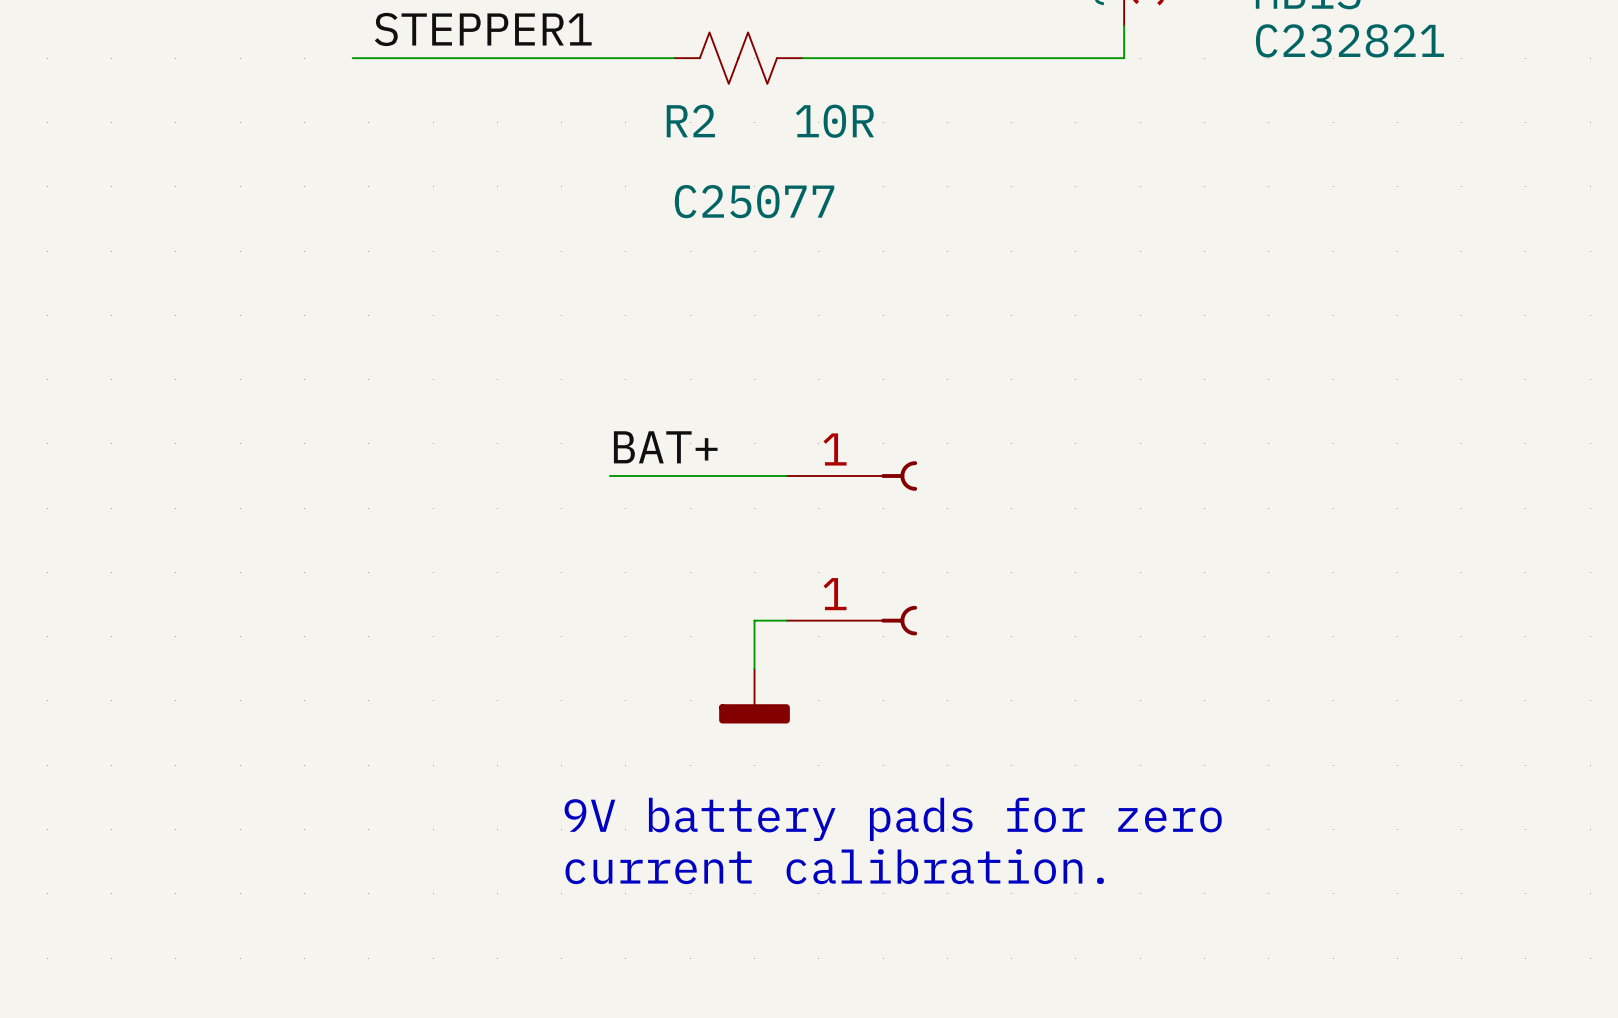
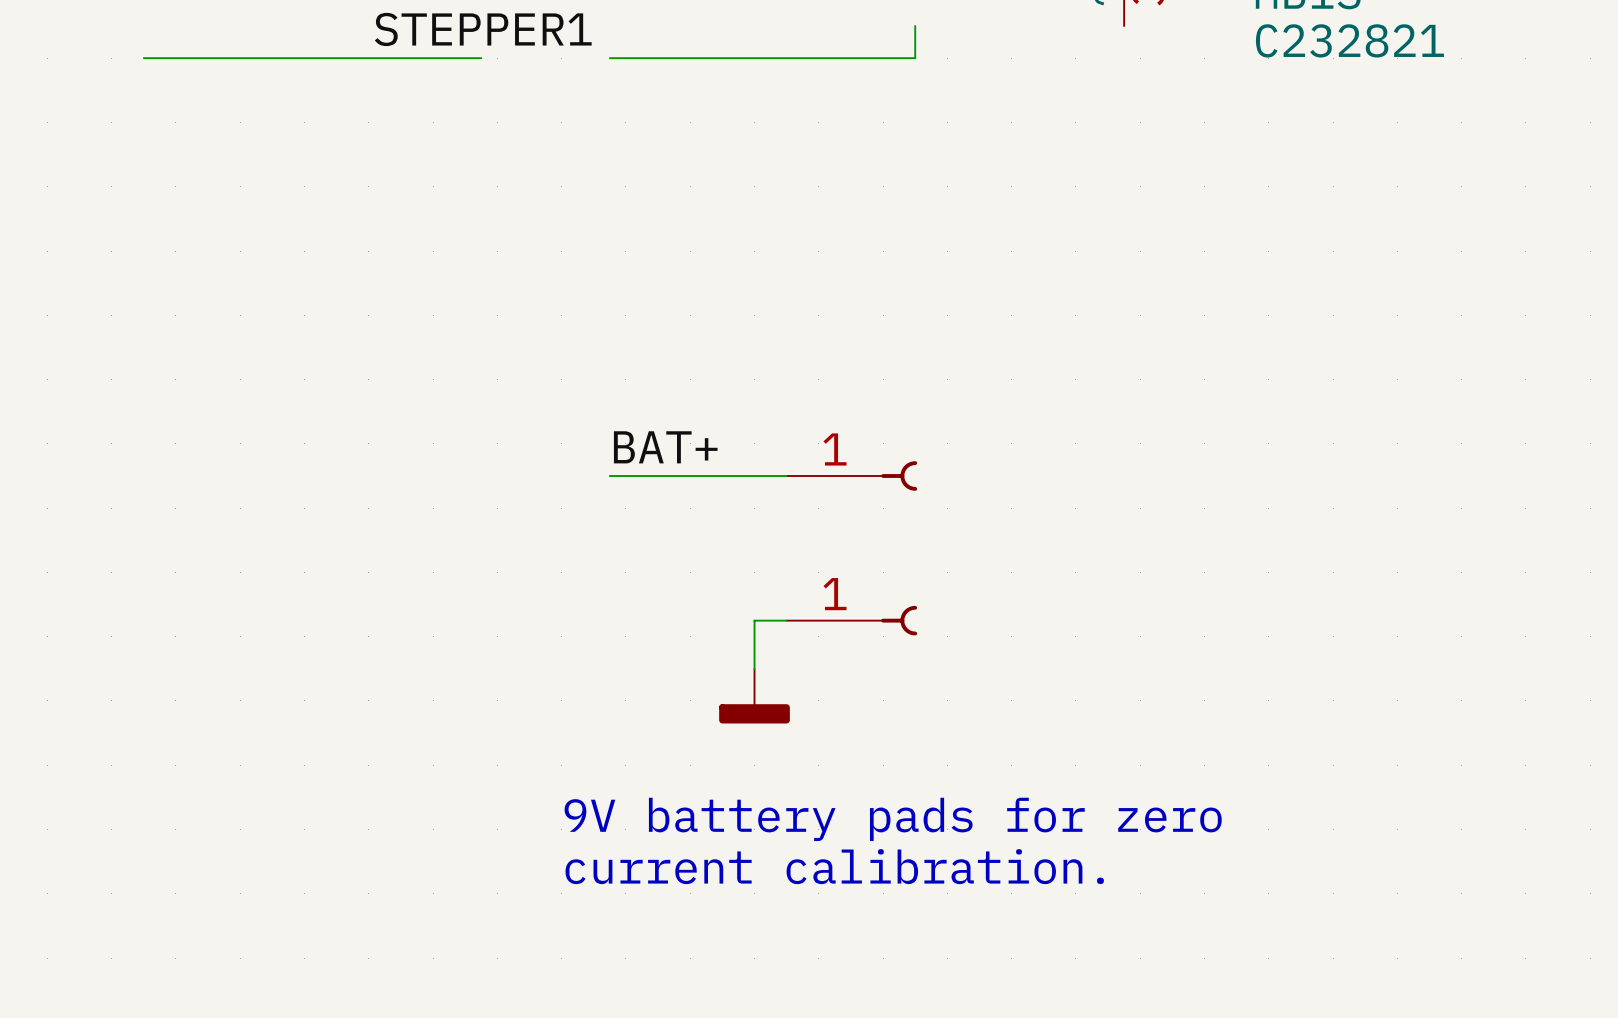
wire: (1124, 26) (1124, 58) (915, 58) -> (915, 26) (915, 58)
wire: none -> (143, 58) (352, 58)
wire: (481, 58) (609, 58) -> (674, 58) (802, 58)
R2: 10R (738, 58) -> none

